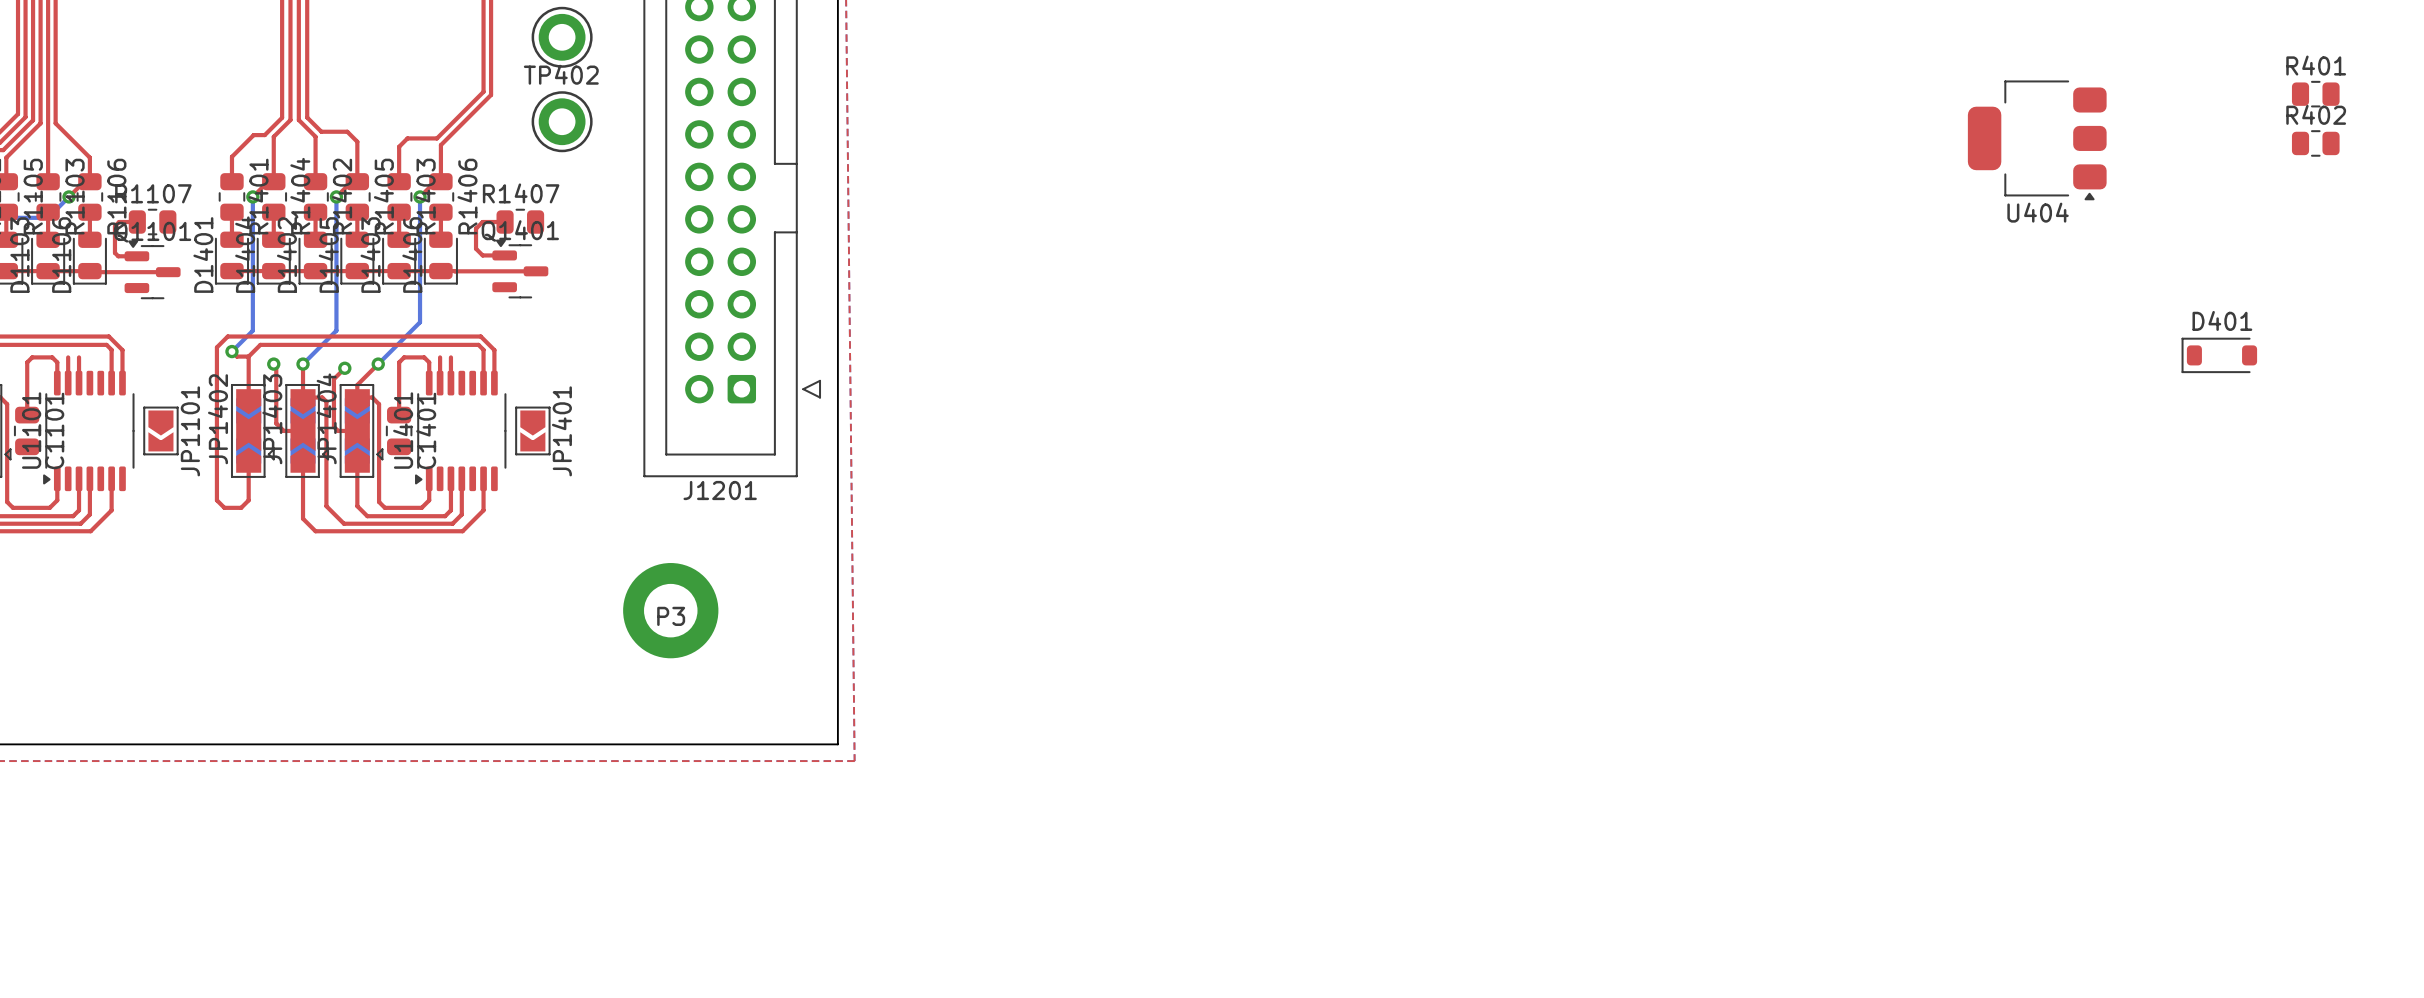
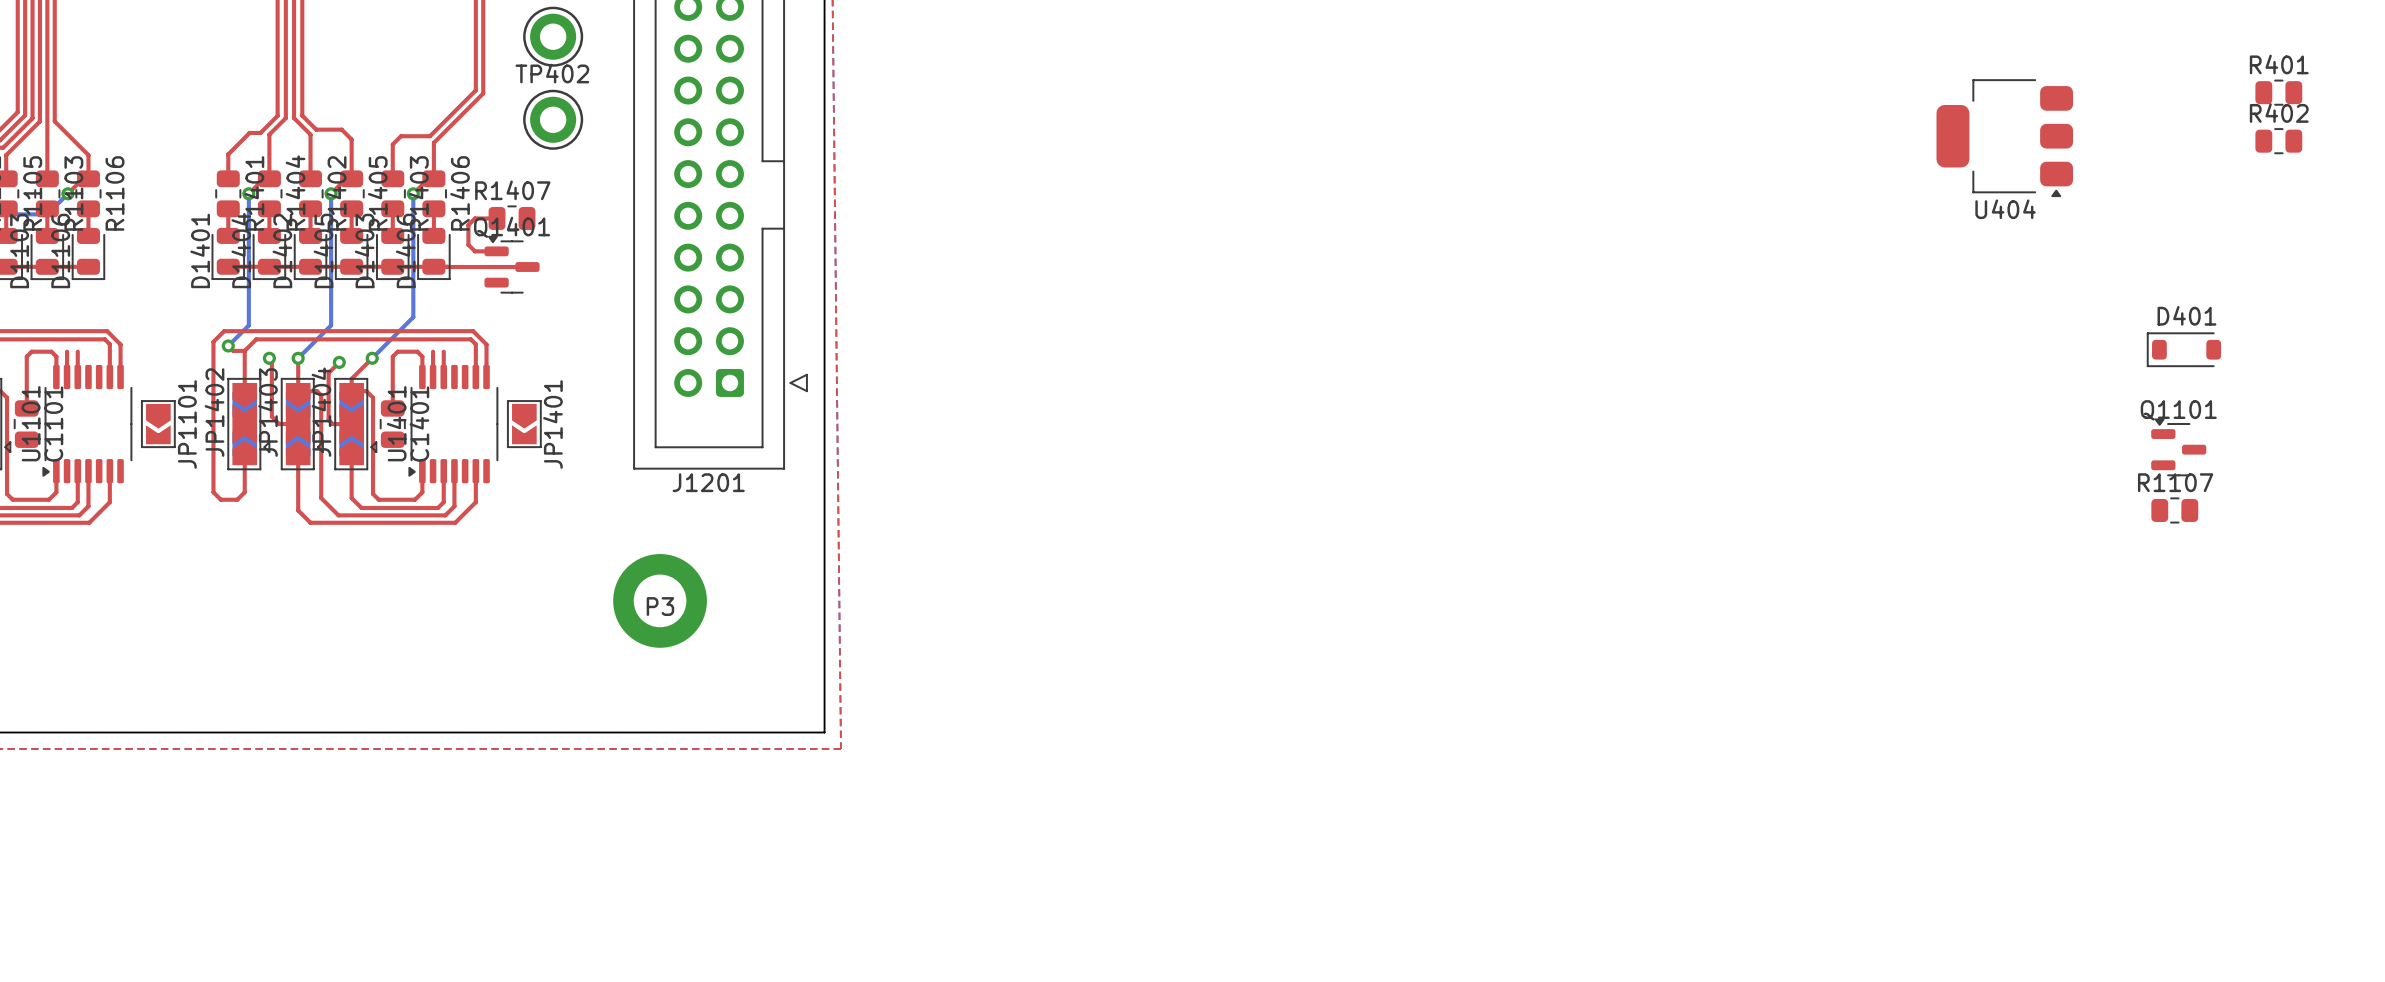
top track: (137, 222) (119, 222) (114, 226) (114, 252) (118, 256) (136, 256) -> none
R1107 position: (152, 222) -> (2174, 510)
Q1101 position: (152, 269) -> (2178, 447)
top track: (89, 271) (168, 272) -> none

